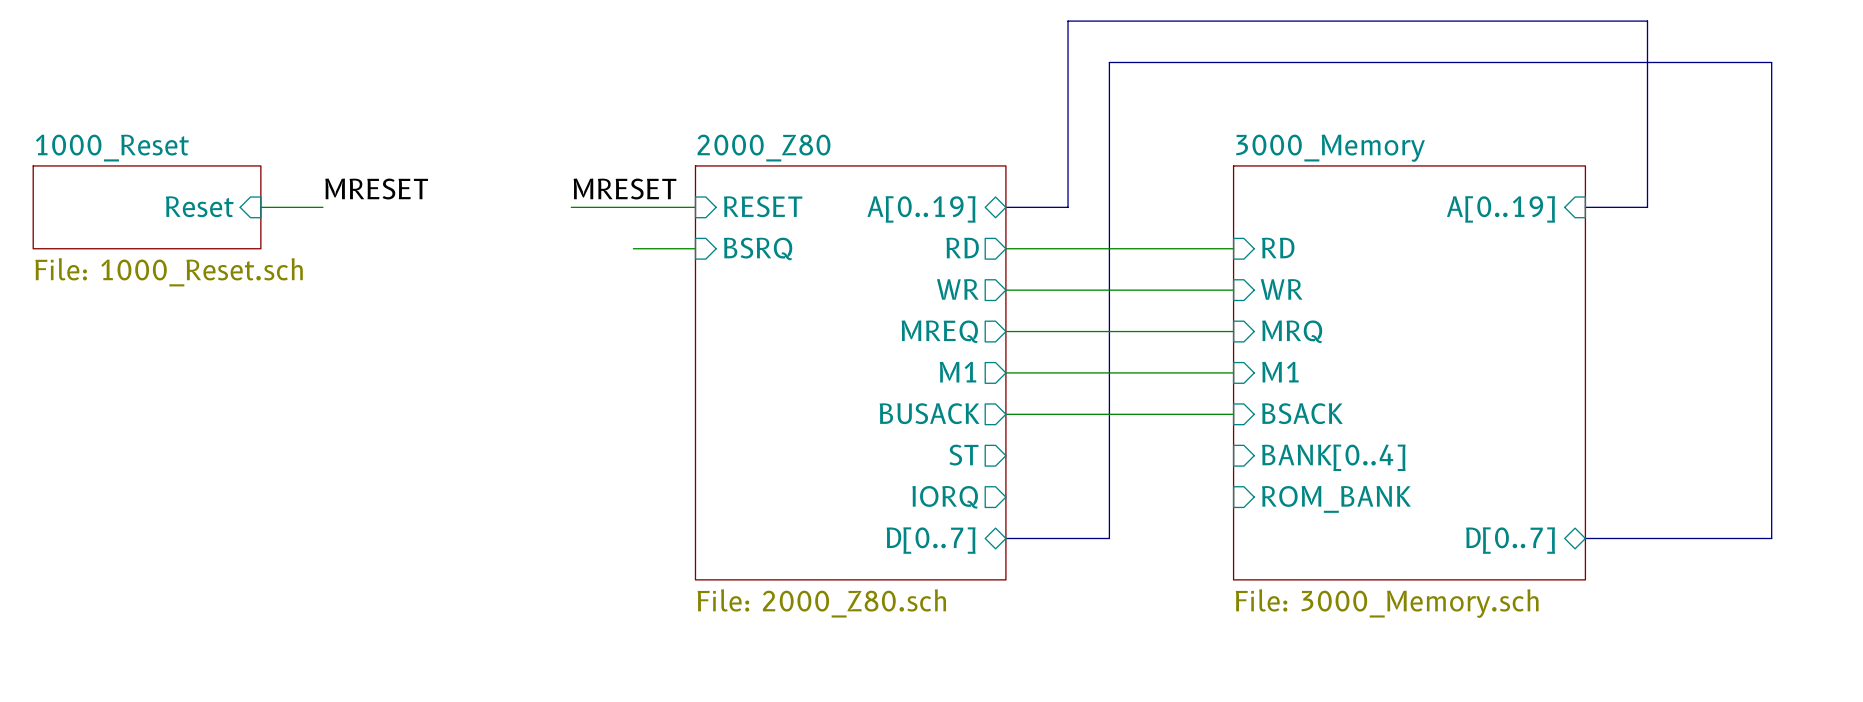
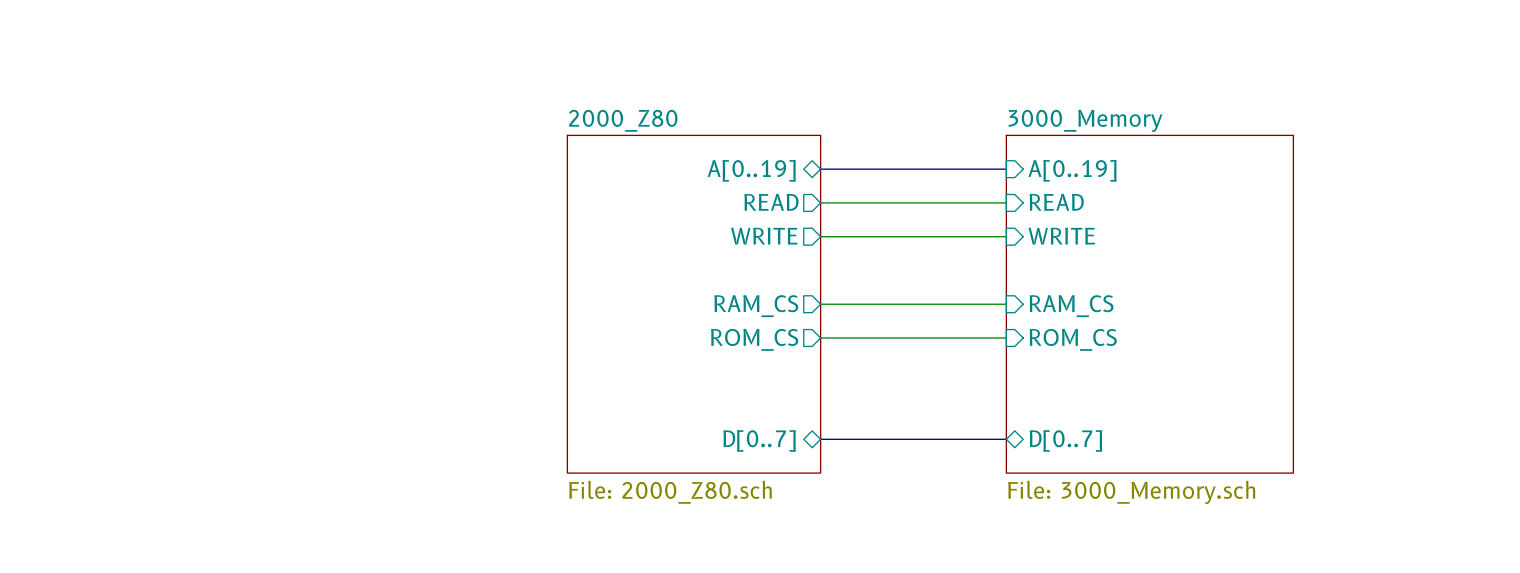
label: MRESET (376, 189) -> none
label: MRESET (625, 189) -> none
sheet pin: Reset (199, 206) -> none
sheet pin: RESET (763, 206) -> none
sheet 1000_Reset: File: 1000_Reset.sch (147, 207) -> none
wire: (260, 207) (322, 207) -> none
wire: (571, 207) (695, 207) -> none
bus: (1068, 207) (1068, 21) (1647, 21) (1647, 207) (1585, 207) -> (871, 169) (1006, 169)
sheet pin rotation: 0° (1500, 209) -> 180° (1072, 170)
wire: (633, 248) (695, 248) -> none
sheet pin: BSRQ (758, 248) -> none
sheet pin: RD (962, 248) -> READ (771, 202)
sheet pin: RD (1278, 248) -> READ (1056, 202)
sheet pin: WR (957, 289) -> WRITE (764, 236)
sheet pin: WR (1281, 289) -> WRITE (1061, 236)
sheet pin: MREQ (939, 331) -> none
wire: (1005, 331) (1233, 331) -> none
sheet pin: MRQ (1292, 331) -> none
sheet pin: M1 (958, 372) -> RAM_CS (756, 306)
sheet pin: M1 (1280, 372) -> RAM_CS (1071, 306)
sheet pin: BUSACK (929, 413) -> ROM_CS (754, 339)
sheet pin: BSACK (1302, 413) -> ROM_CS (1073, 339)
sheet pin: ST (963, 455) -> none
sheet pin: BANK[0..4] (1333, 457) -> none
sheet pin: IORQ (945, 497) -> none
sheet pin: ROM_BANK (1336, 499) -> none
bus: (1109, 538) (1109, 62) (1771, 62) (1771, 538) (1585, 538) -> (905, 439) (1006, 439)
sheet pin rotation: 0° (1510, 540) -> 180° (1065, 441)
sheet pin position: D[0..7] (1510, 540) -> D[0..7] (1065, 441)

